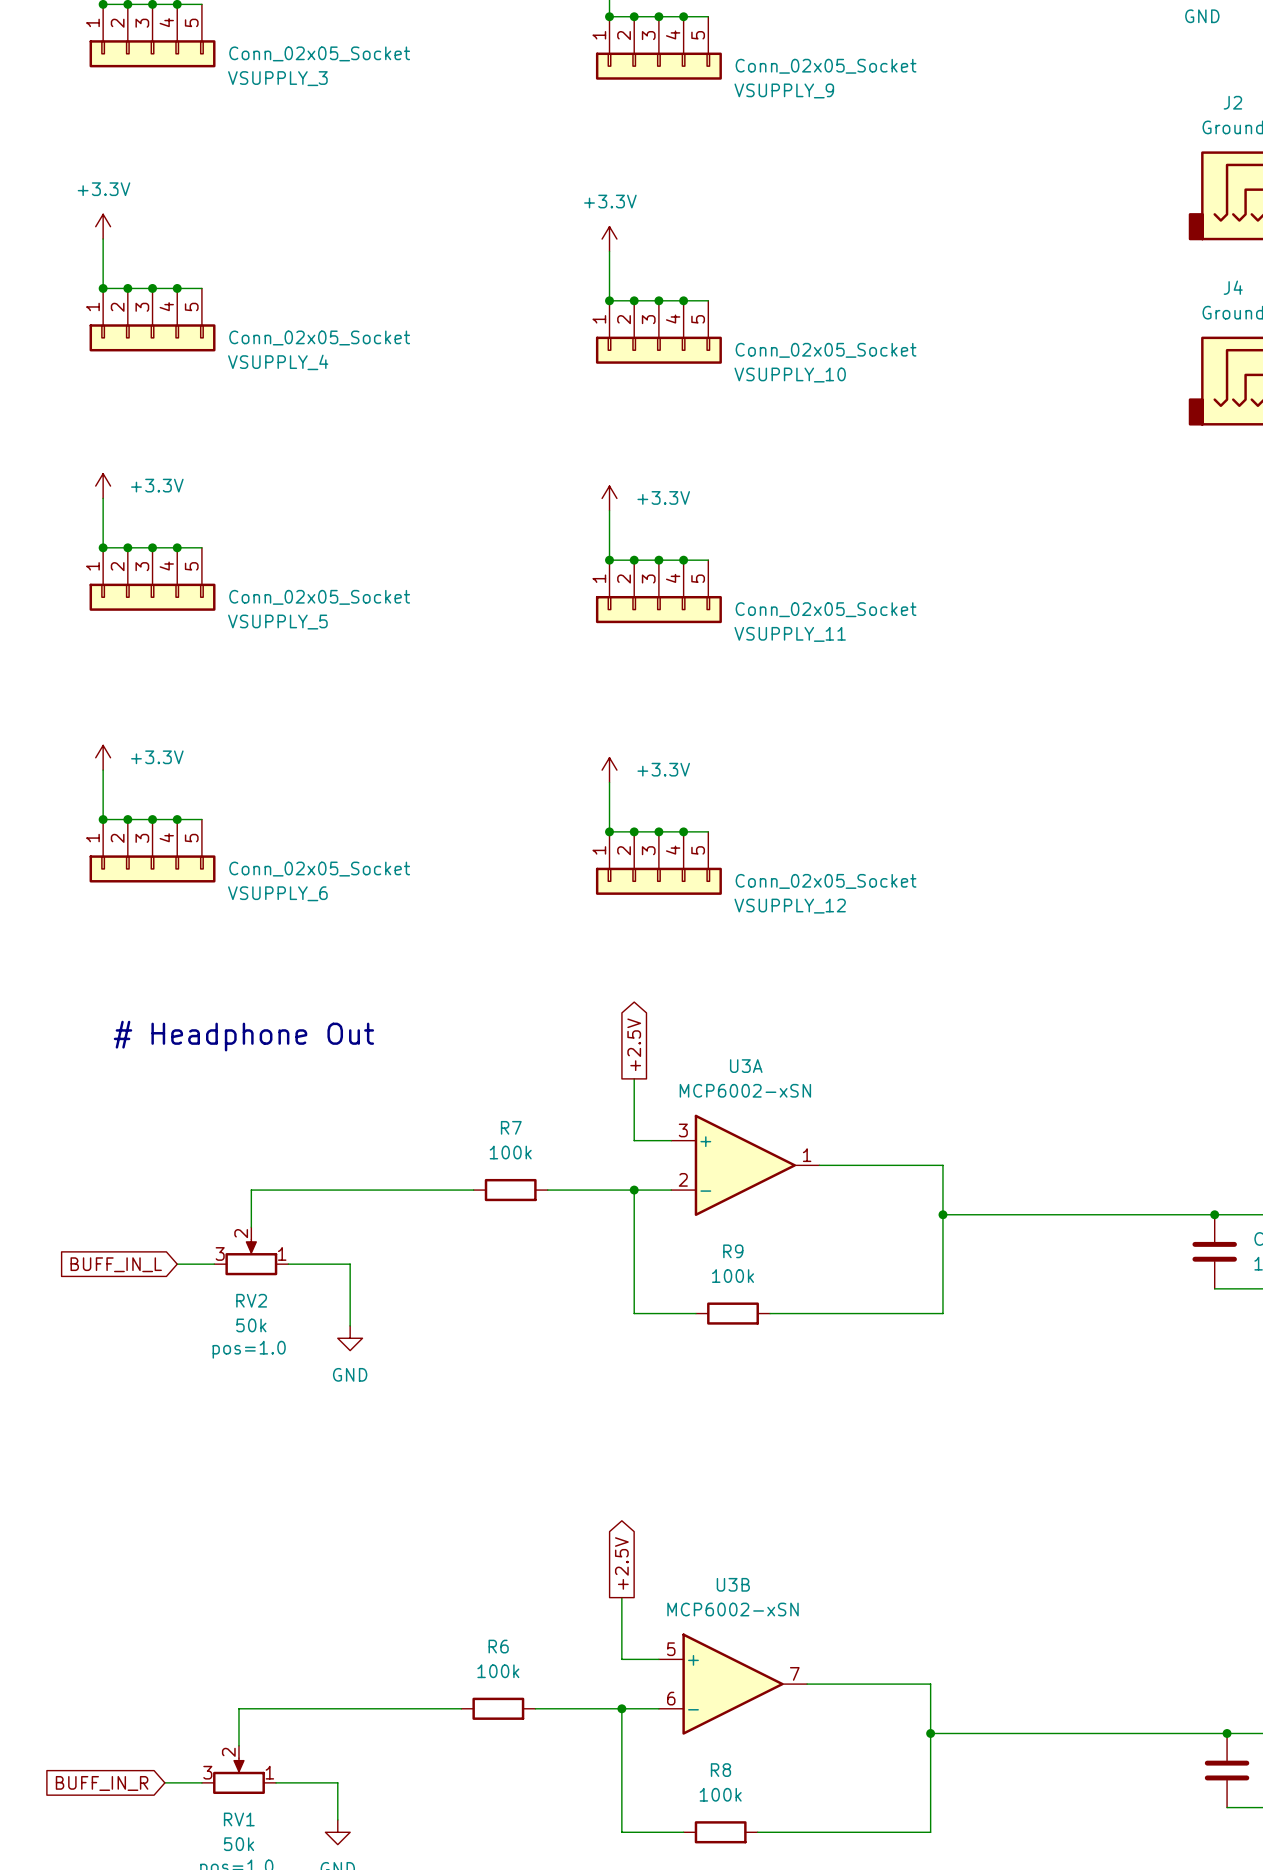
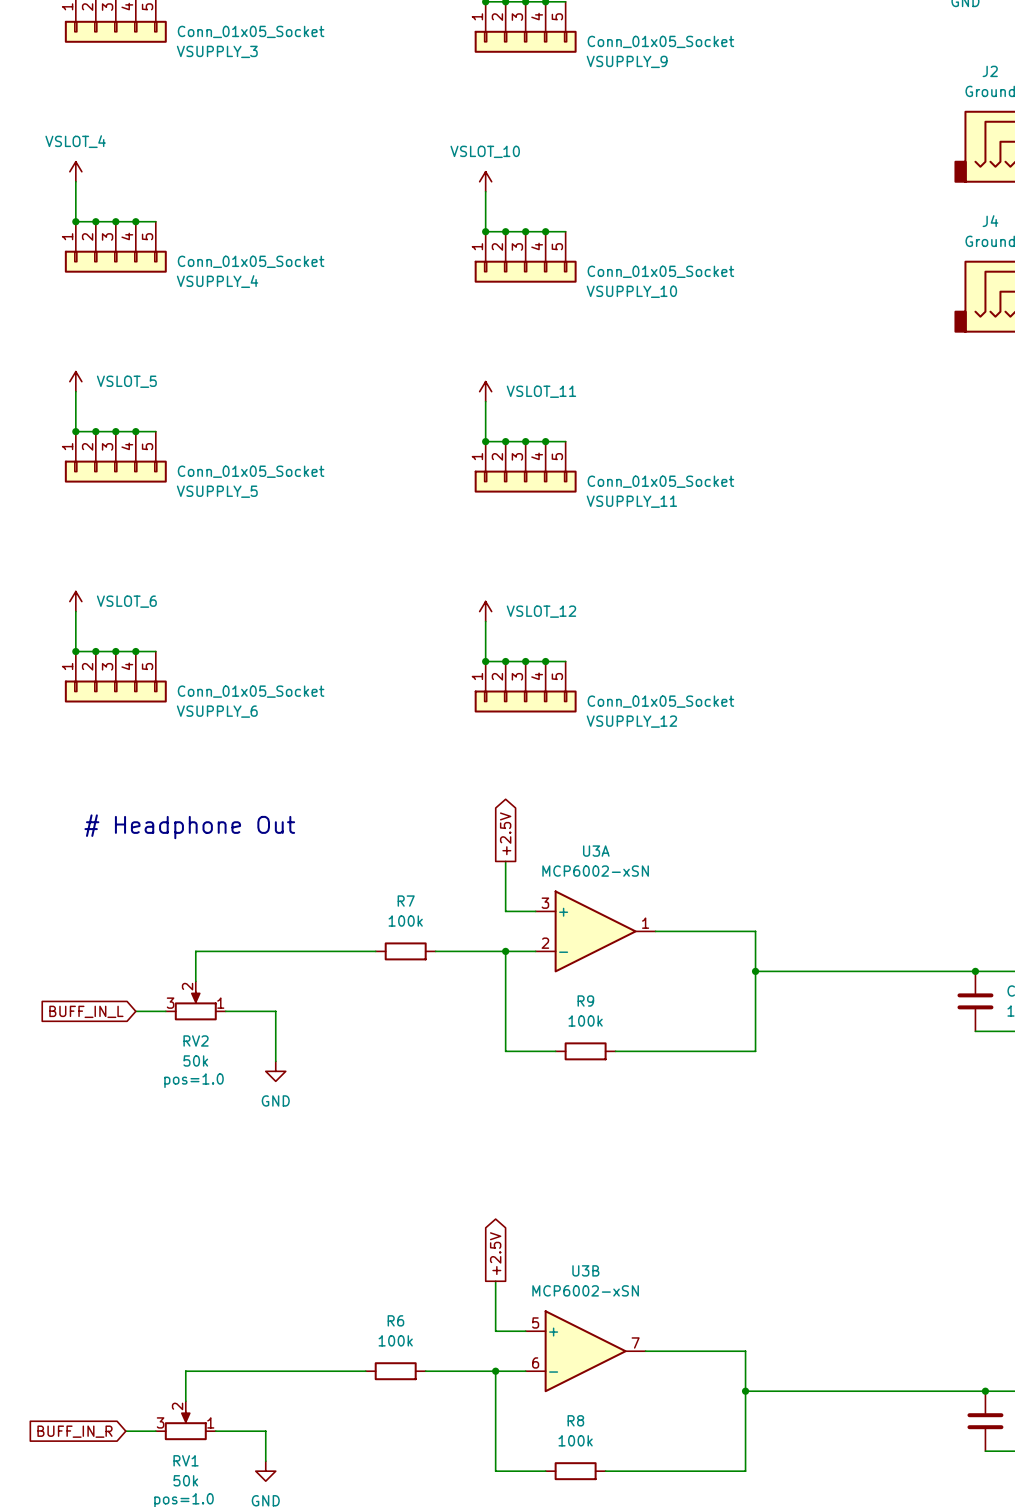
VSUPPLY_3 value: Conn_02x05_Socket (319, 53) -> Conn_01x05_Socket (251, 31)
VSUPPLY_9 value: Conn_02x05_Socket (826, 66) -> Conn_01x05_Socket (660, 41)
power symbol: +3.3V (103, 226) -> VSLOT_4 (75, 171)
power symbol: +3.3V (609, 239) -> VSLOT_10 (485, 181)
VSUPPLY_4 value: Conn_02x05_Socket (319, 337) -> Conn_01x05_Socket (251, 261)
VSUPPLY_10 value: Conn_02x05_Socket (826, 350) -> Conn_01x05_Socket (660, 271)
power symbol: +3.3V (103, 486) -> VSLOT_5 (75, 381)
power symbol: +3.3V (609, 498) -> VSLOT_11 (485, 391)
VSUPPLY_5 value: Conn_02x05_Socket (319, 597) -> Conn_01x05_Socket (251, 471)
VSUPPLY_11 value: Conn_02x05_Socket (826, 609) -> Conn_01x05_Socket (660, 481)
power symbol: +3.3V (103, 757) -> VSLOT_6 (75, 601)
power symbol: +3.3V (609, 770) -> VSLOT_12 (485, 611)
VSUPPLY_6 value: Conn_02x05_Socket (319, 869) -> Conn_01x05_Socket (251, 691)
VSUPPLY_12 value: Conn_02x05_Socket (826, 881) -> Conn_01x05_Socket (660, 701)

